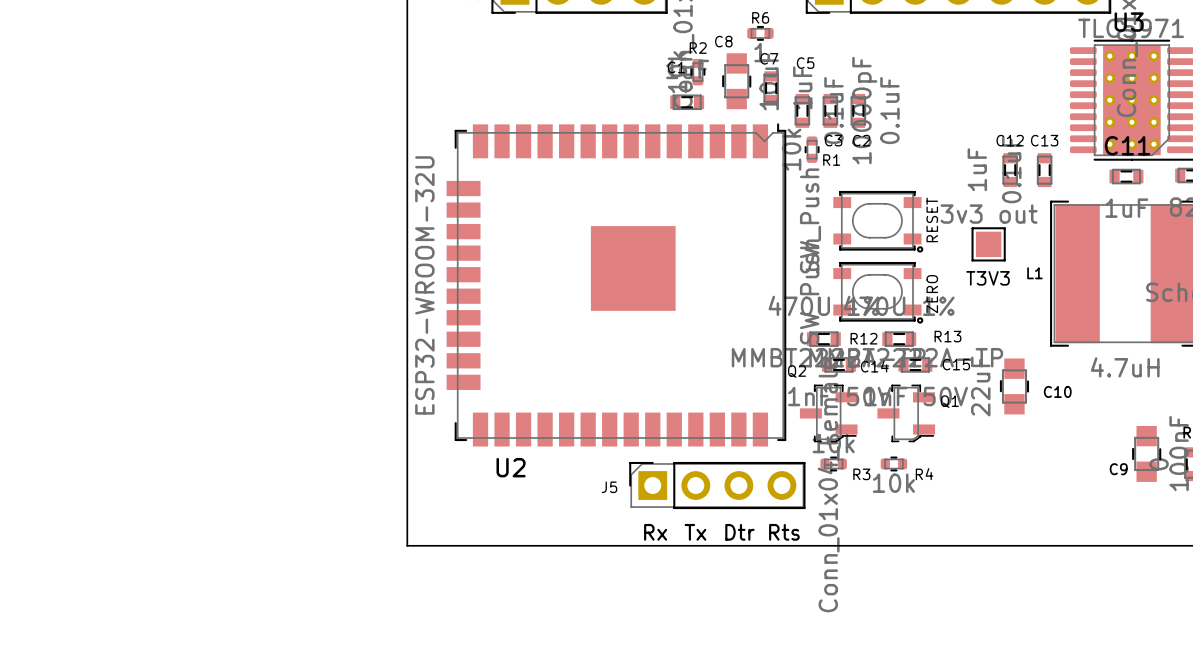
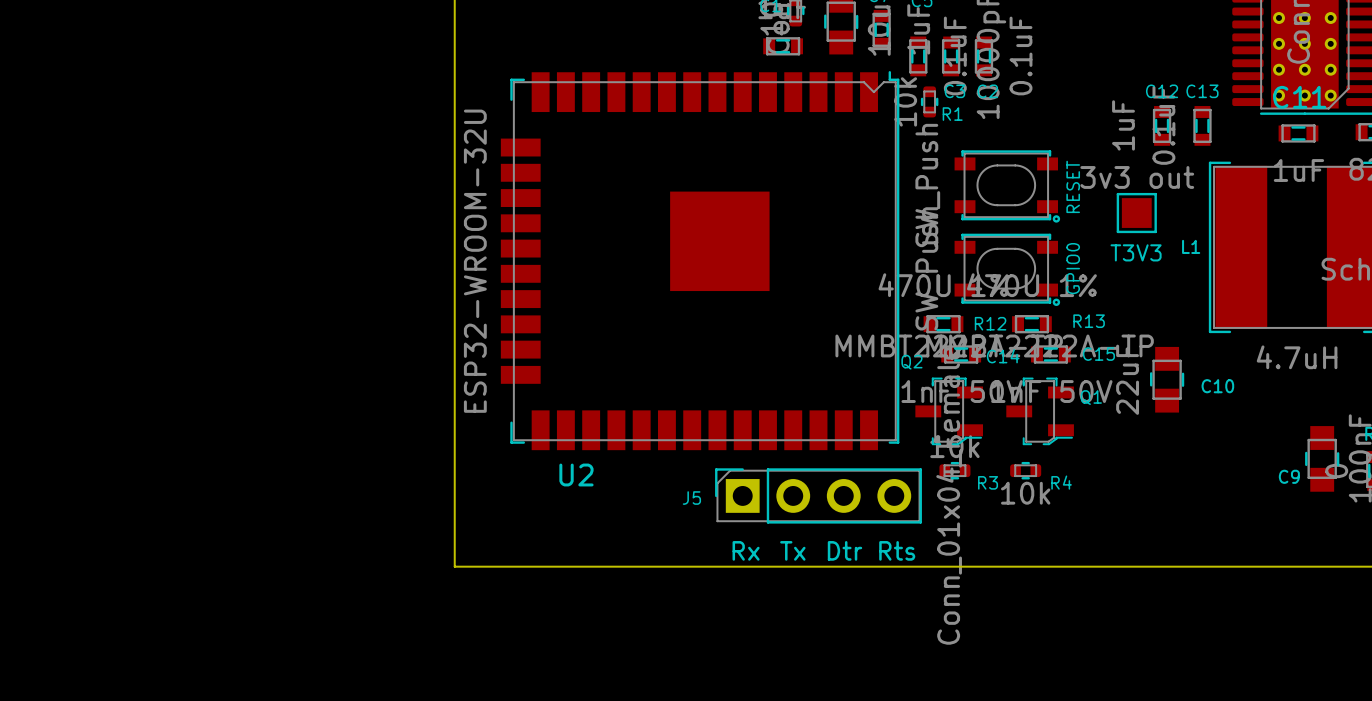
text: RESET (932, 219) -> none
RESET name: none -> RESET (1073, 186)
GPIO0 name: none -> GPIO0 (1073, 268)
text: ZERO (932, 294) -> none

